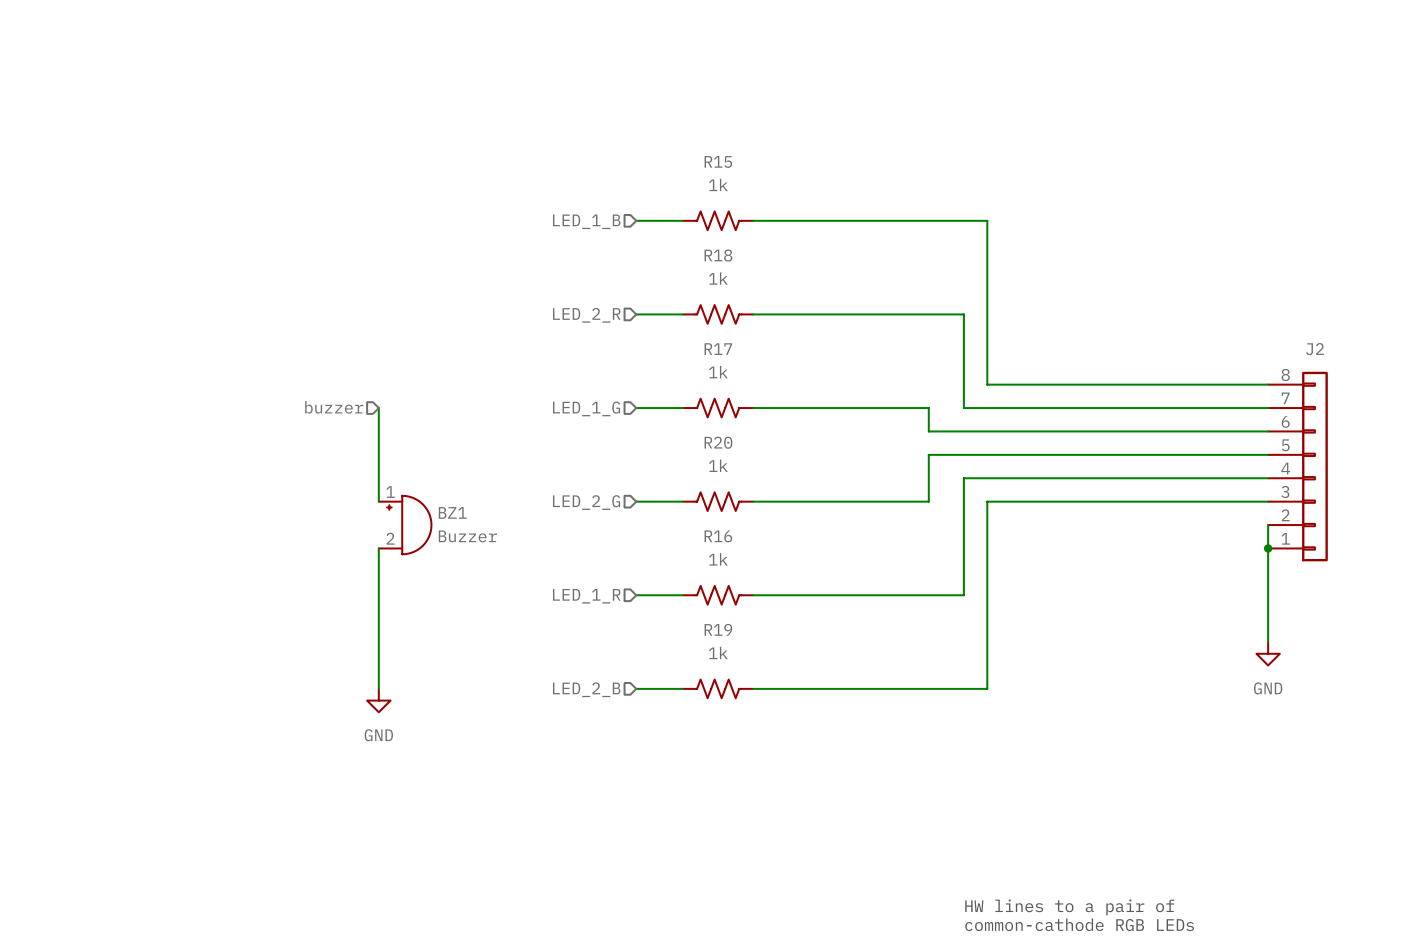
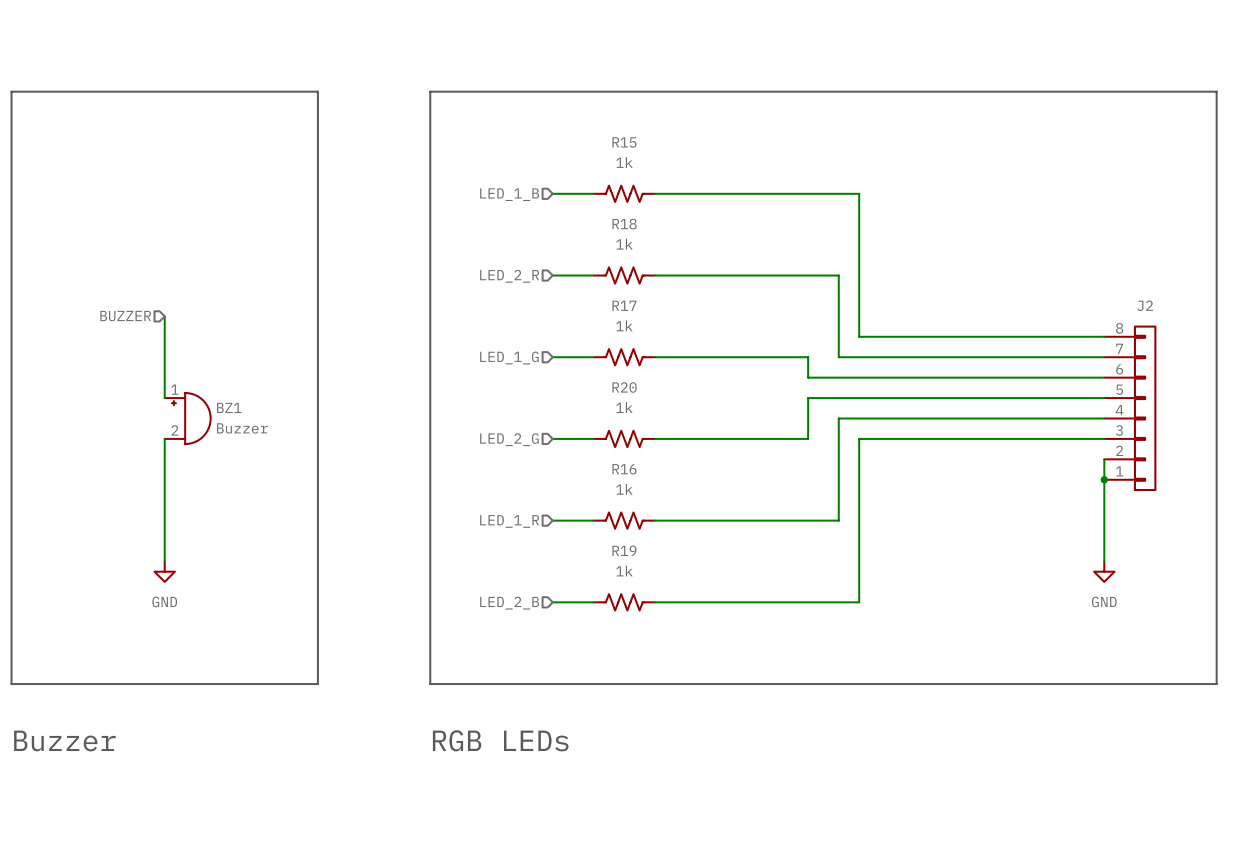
line: none -> (11, 91) (11, 684) (317, 684) (317, 91) (11, 91)
line: none -> (430, 91) (430, 684) (1216, 684) (1216, 91) (430, 91)
hierarchical label: none -> BUZZER (125, 316)
hierarchical label: buzzer (334, 407) -> none
wire: (378, 408) (378, 501) -> (164, 316) (164, 398)
BZ1 position: (405, 525) -> (187, 418)
wire: (378, 548) (378, 688) -> (164, 438) (164, 561)
power symbol position: GND (378, 700) -> GND (164, 571)
text: none -> Buzzer (64, 740)
text: none -> RGB LEDs (500, 740)
text: HW lines to a pair of (1069, 907) -> none
text: common-cathode RGB LEDs (1079, 924) -> none

